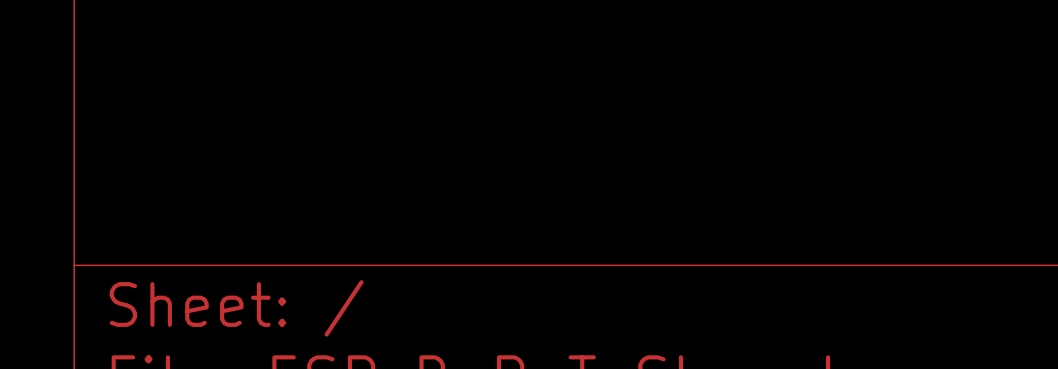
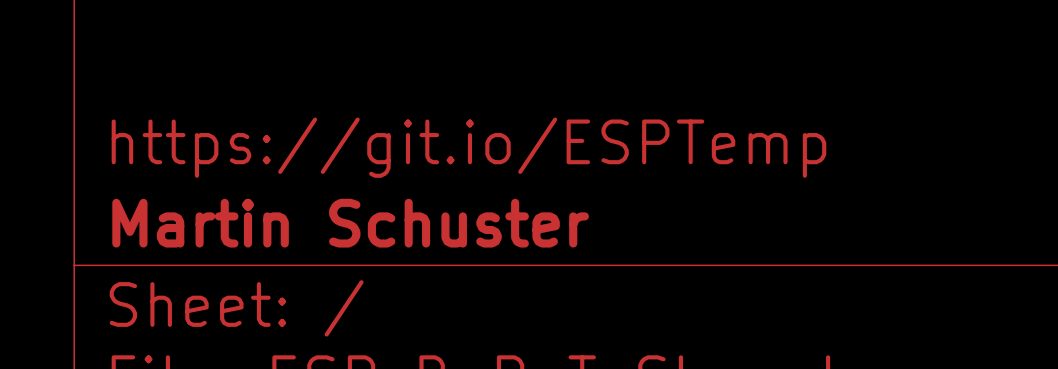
title block: none -> https://git.io/ESPTemp (468, 147)
title block: none -> Martin Schuster (350, 223)

